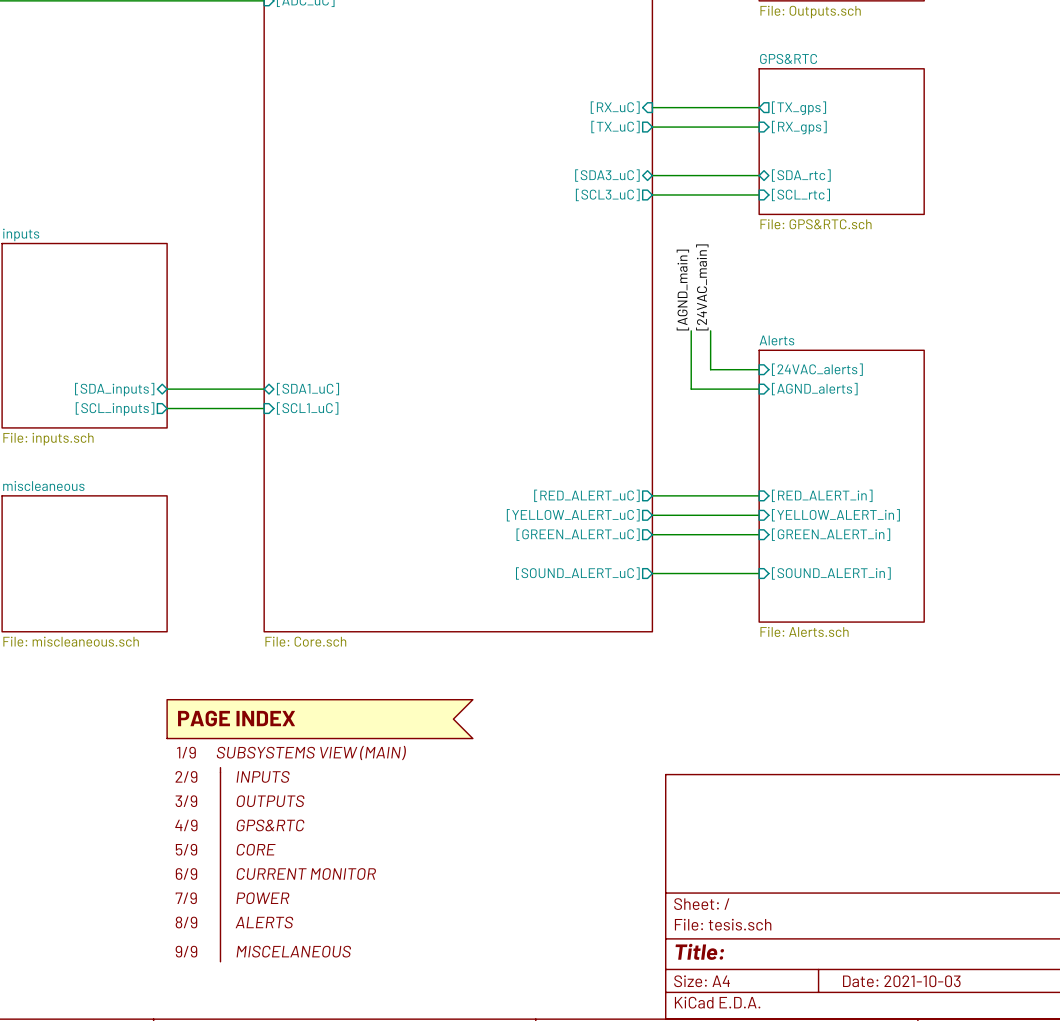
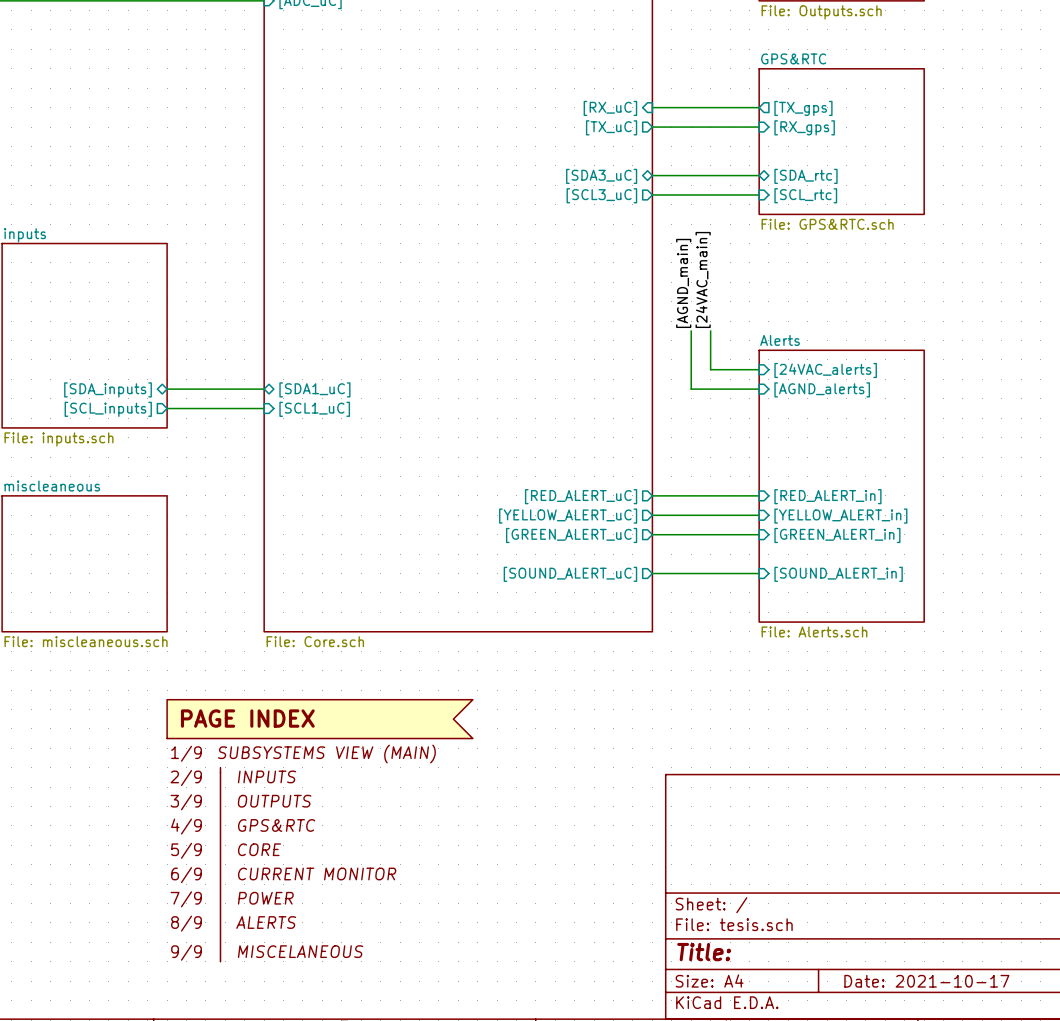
title block: Date: 2021-10-03 (901, 981) -> Date: 2021-10-17 (926, 981)

